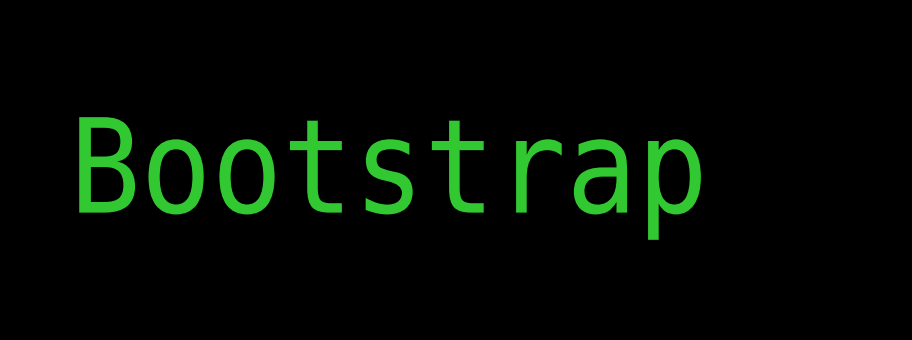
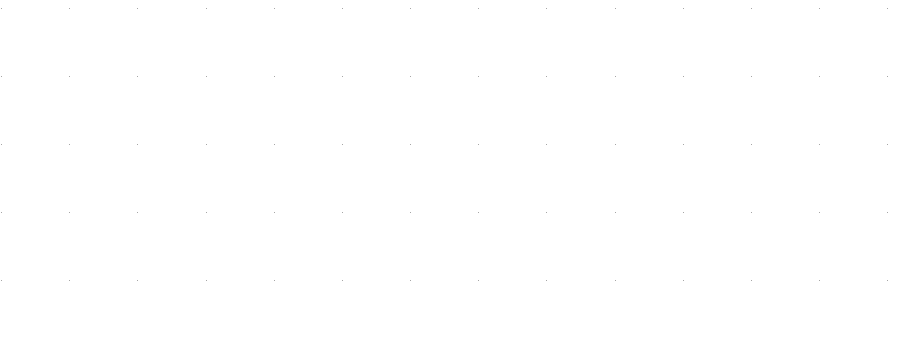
text: Bootstrap (390, 178) -> none

